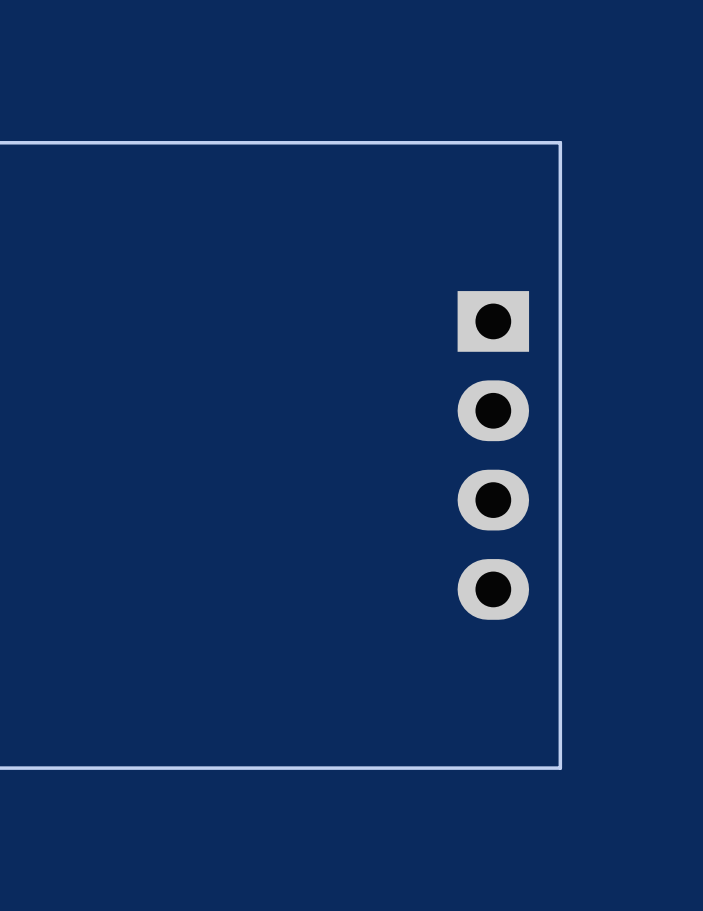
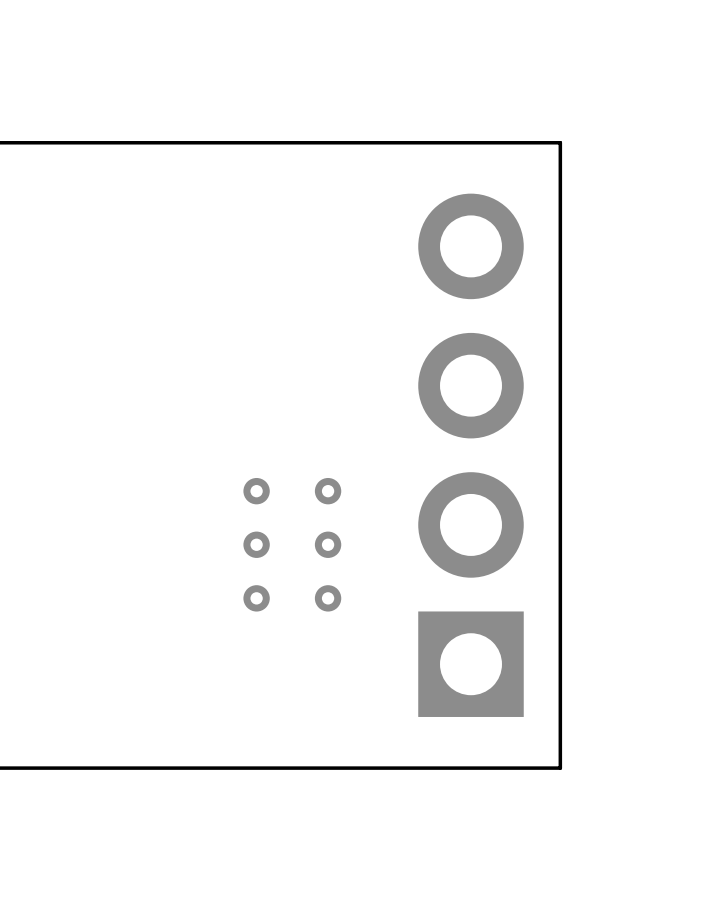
part footprint: [457, 291, 530, 620] -> [418, 193, 524, 717]
part: none -> (256, 491)
part: none -> (328, 491)
part: none -> (256, 544)
part: none -> (328, 544)
part: none -> (256, 598)
part: none -> (328, 598)

